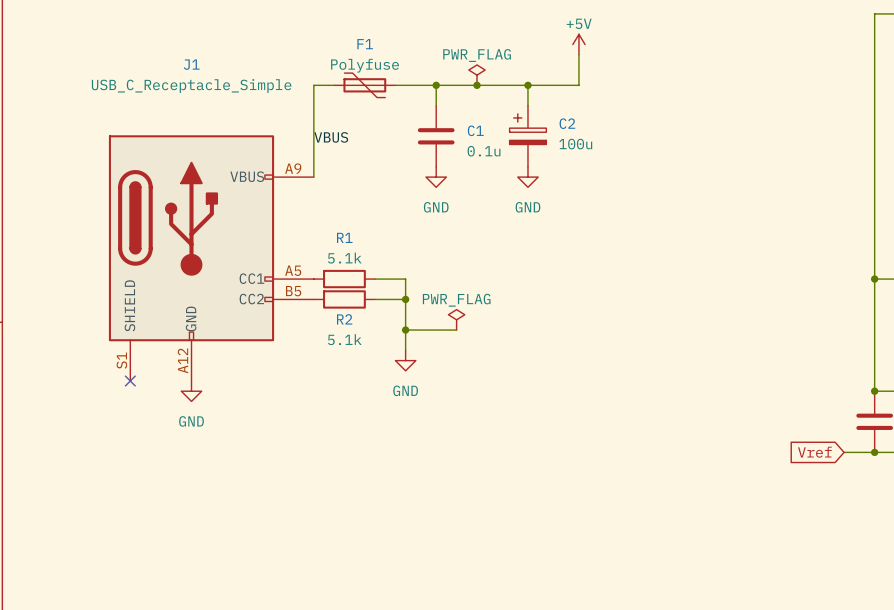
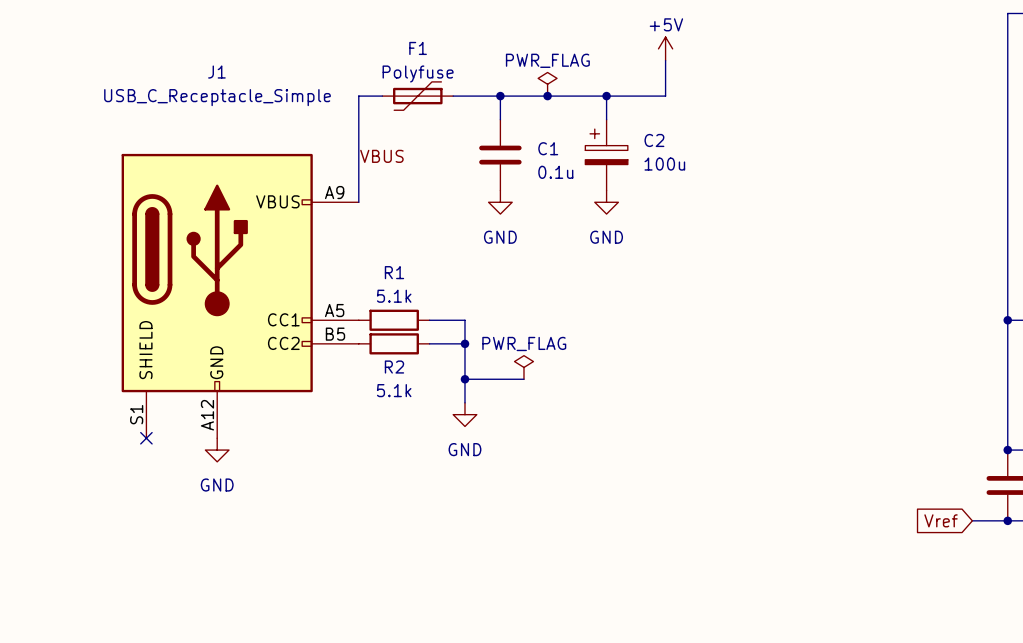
F1 flip: as is (364, 85) -> left-right (417, 96)

